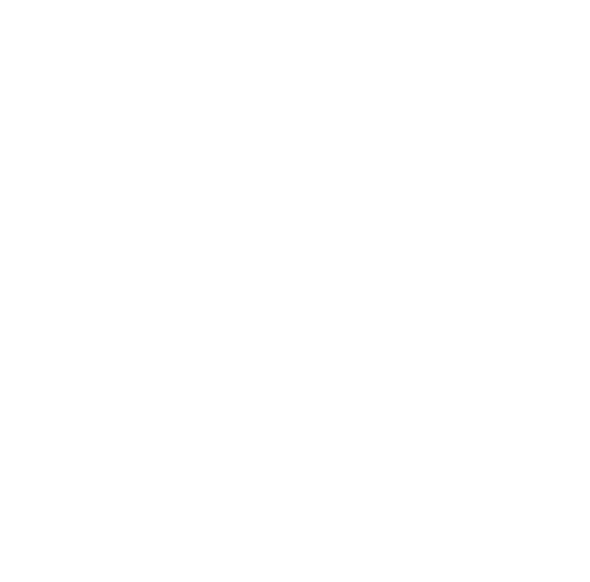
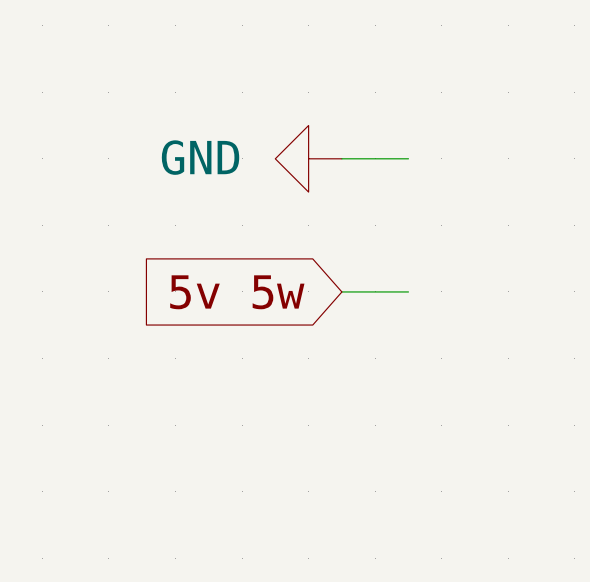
power symbol: none -> GND (308, 158)
wire: none -> (341, 158) (408, 158)
global label: none -> 5v 5w (237, 292)
wire: none -> (341, 291) (408, 291)

